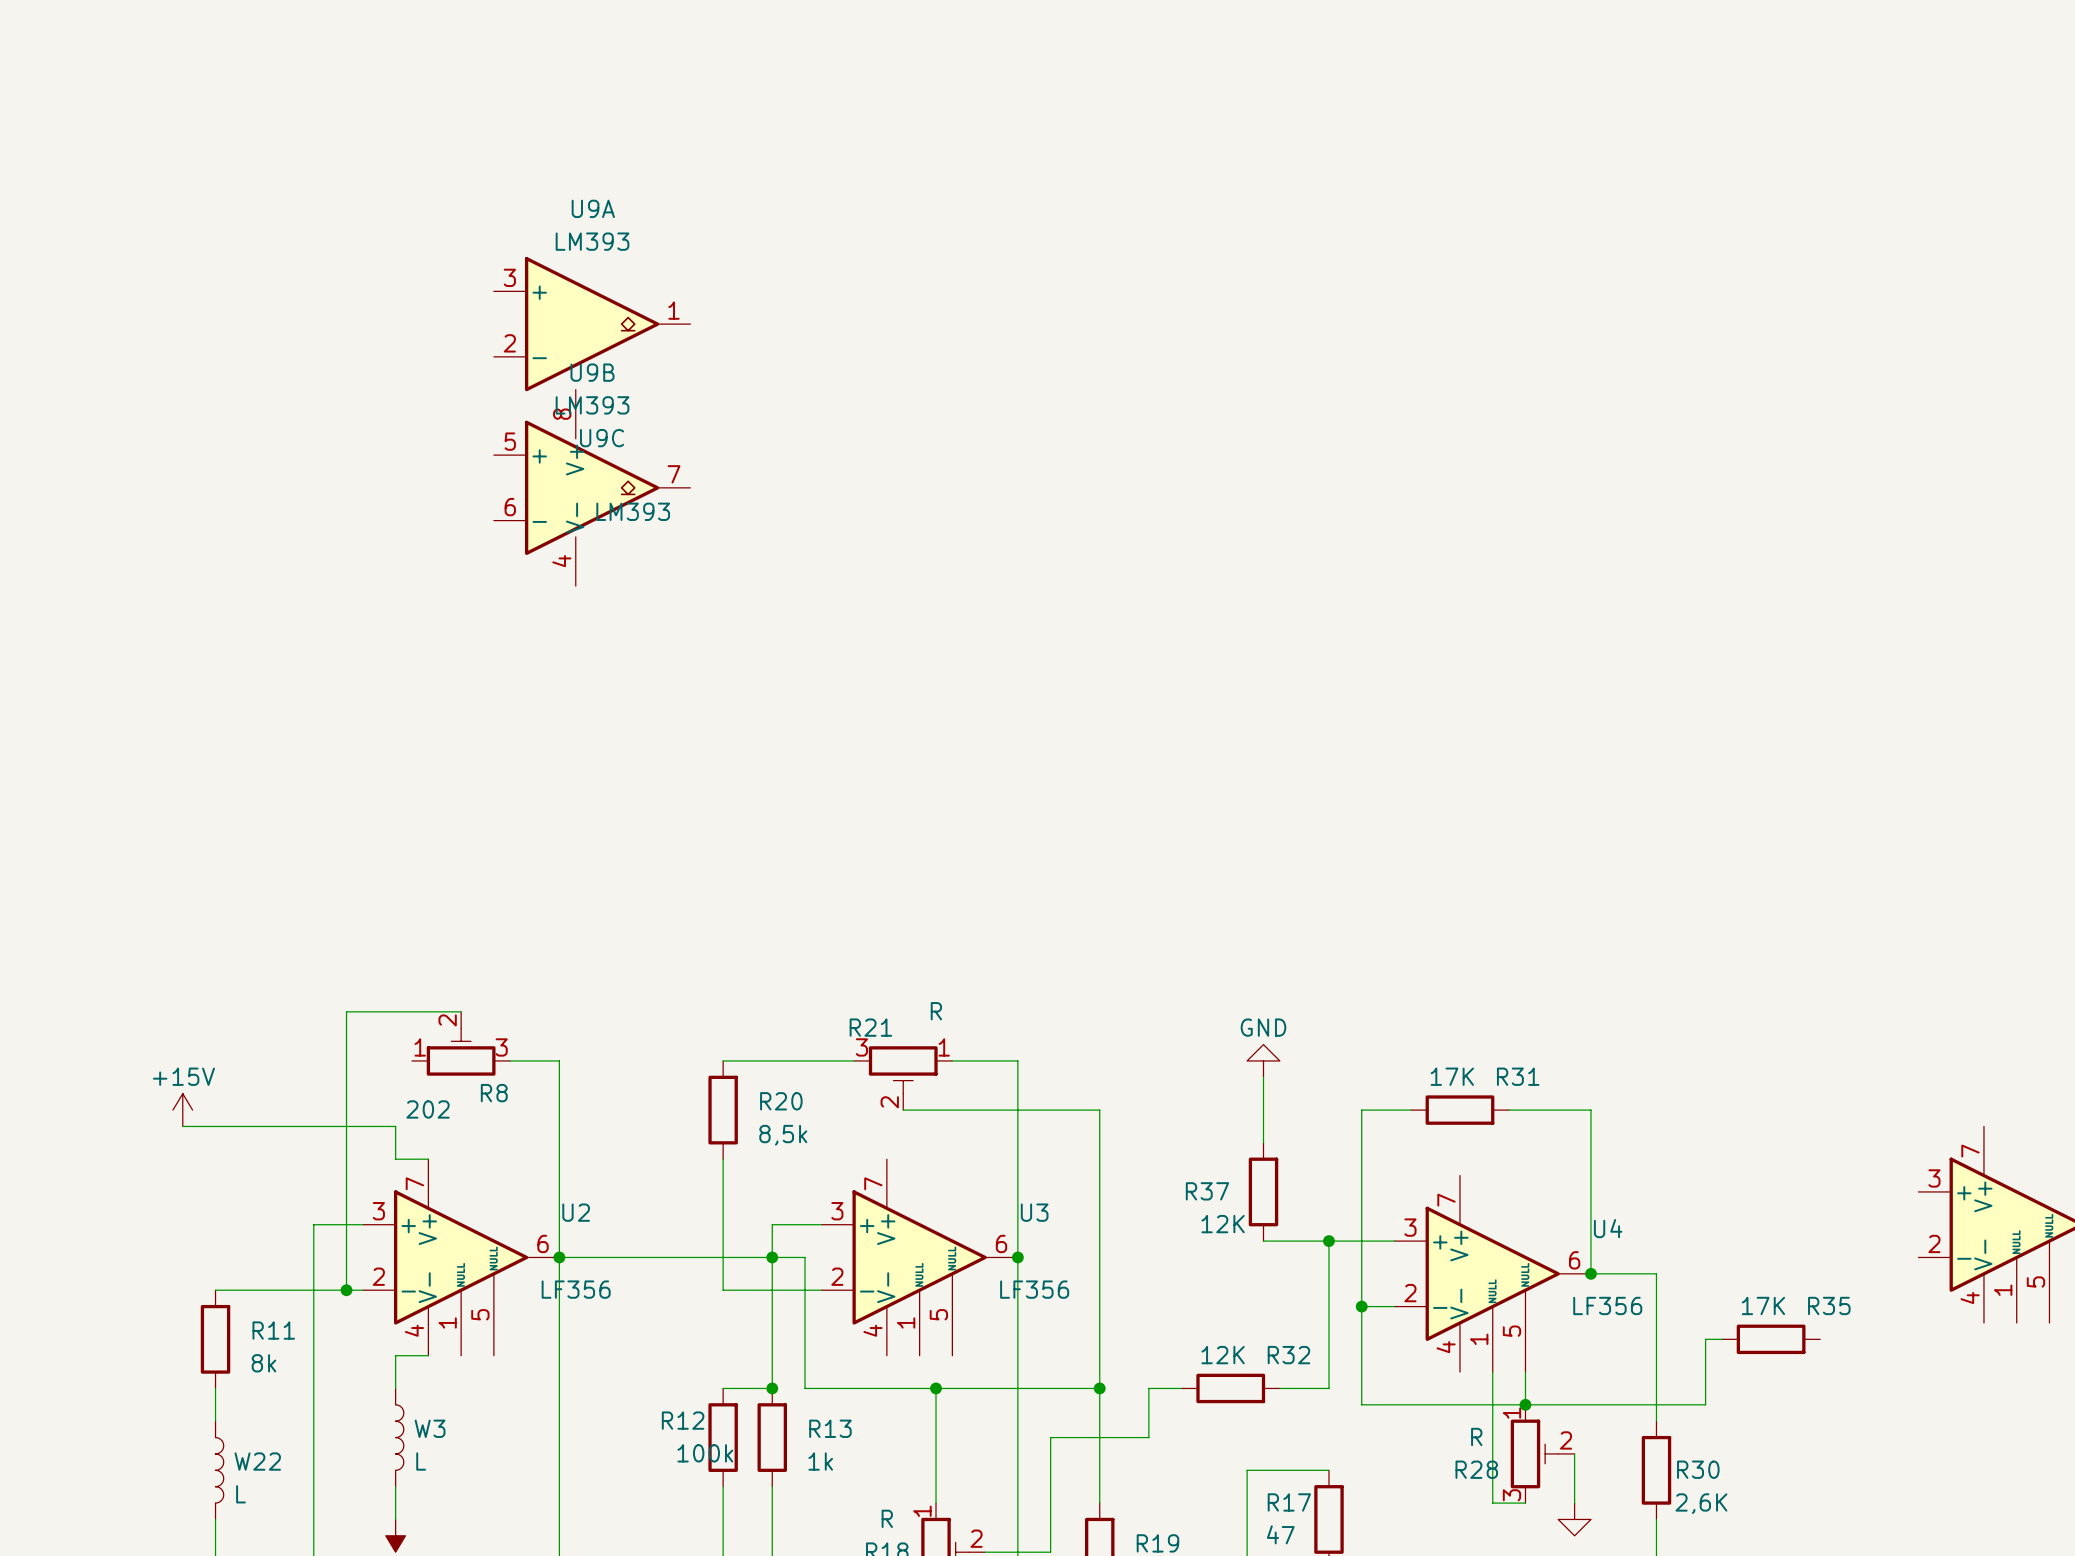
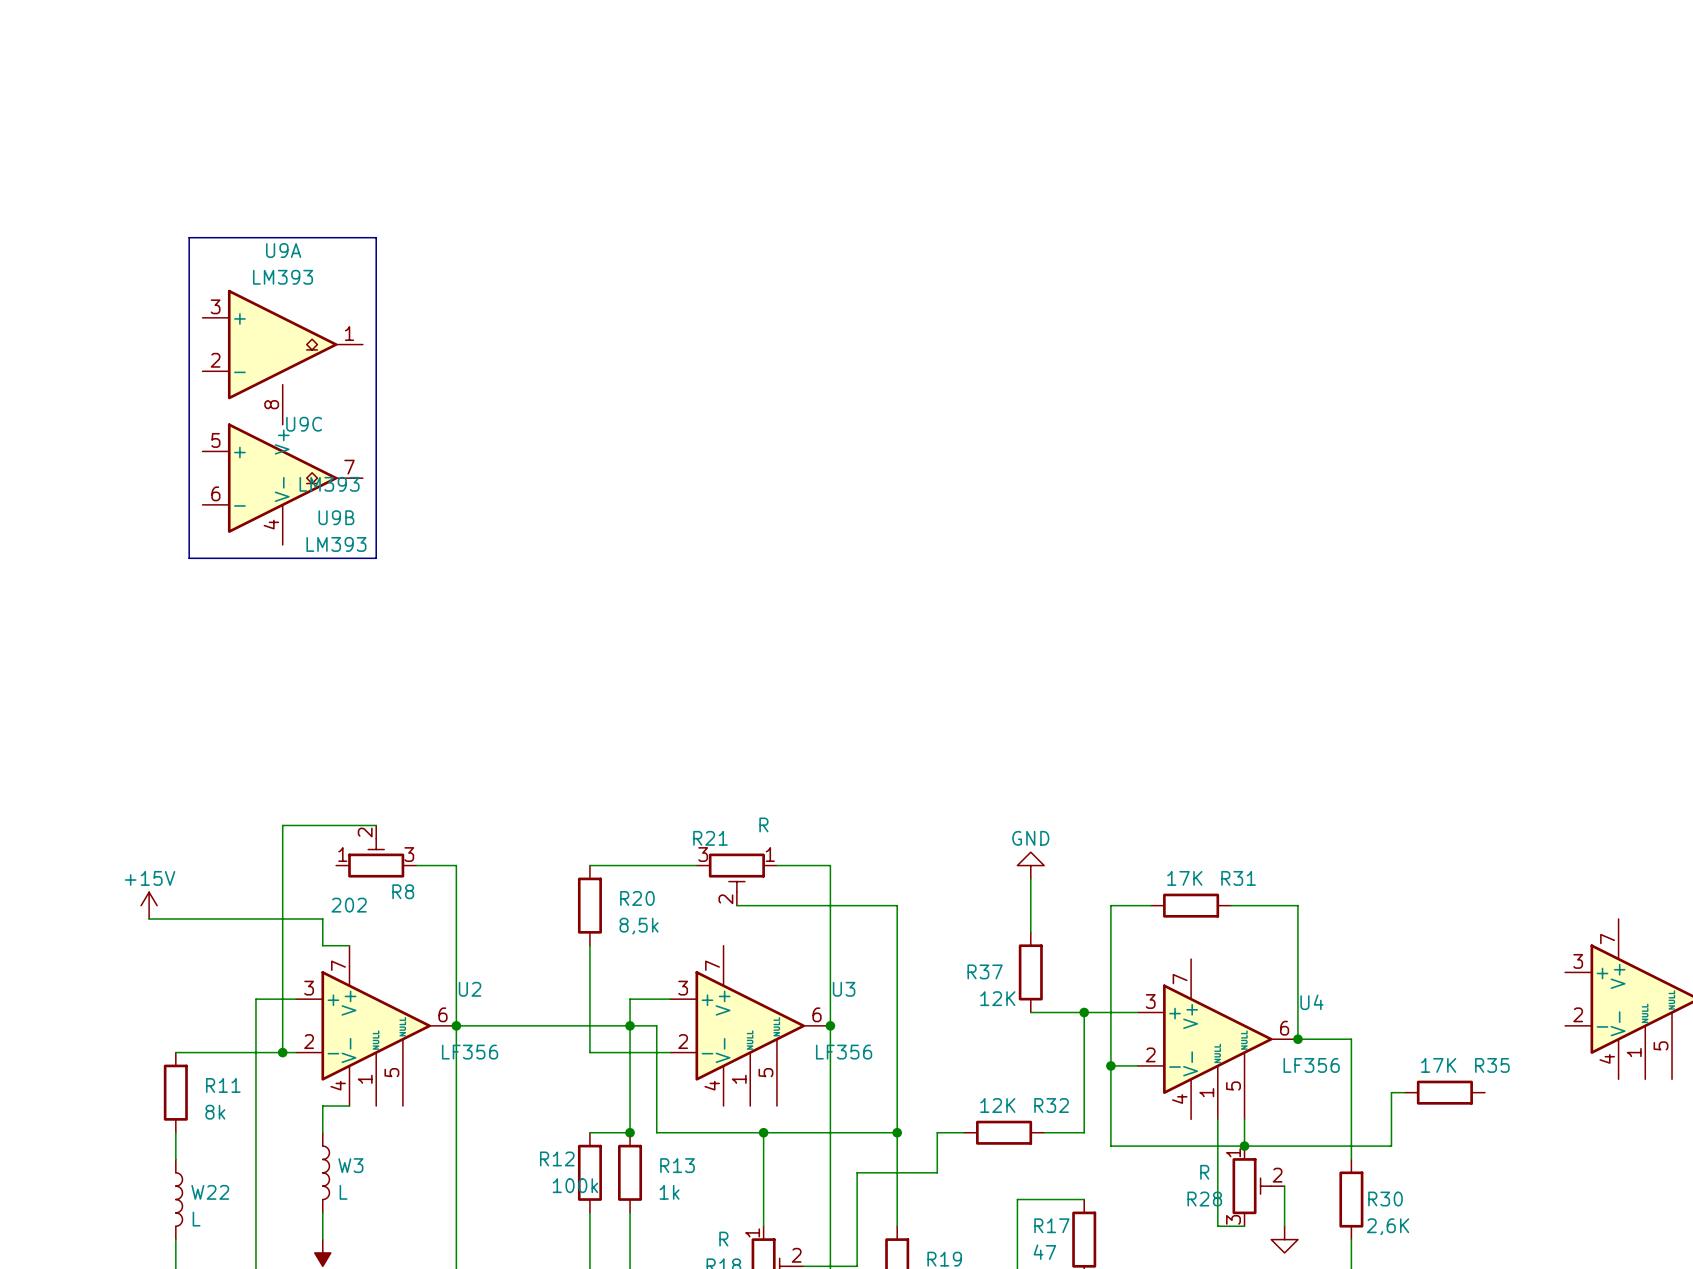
line: none -> (189, 237) (376, 237) (376, 558) (189, 558) (189, 237)
U9A position: (592, 324) -> (282, 344)
U9B name position: U9B (592, 372) -> U9B (336, 517)
U9B value position: LM393 (592, 405) -> LM393 (336, 544)
U9C position: (575, 487) -> (282, 464)
U9B position: (592, 487) -> (282, 478)

